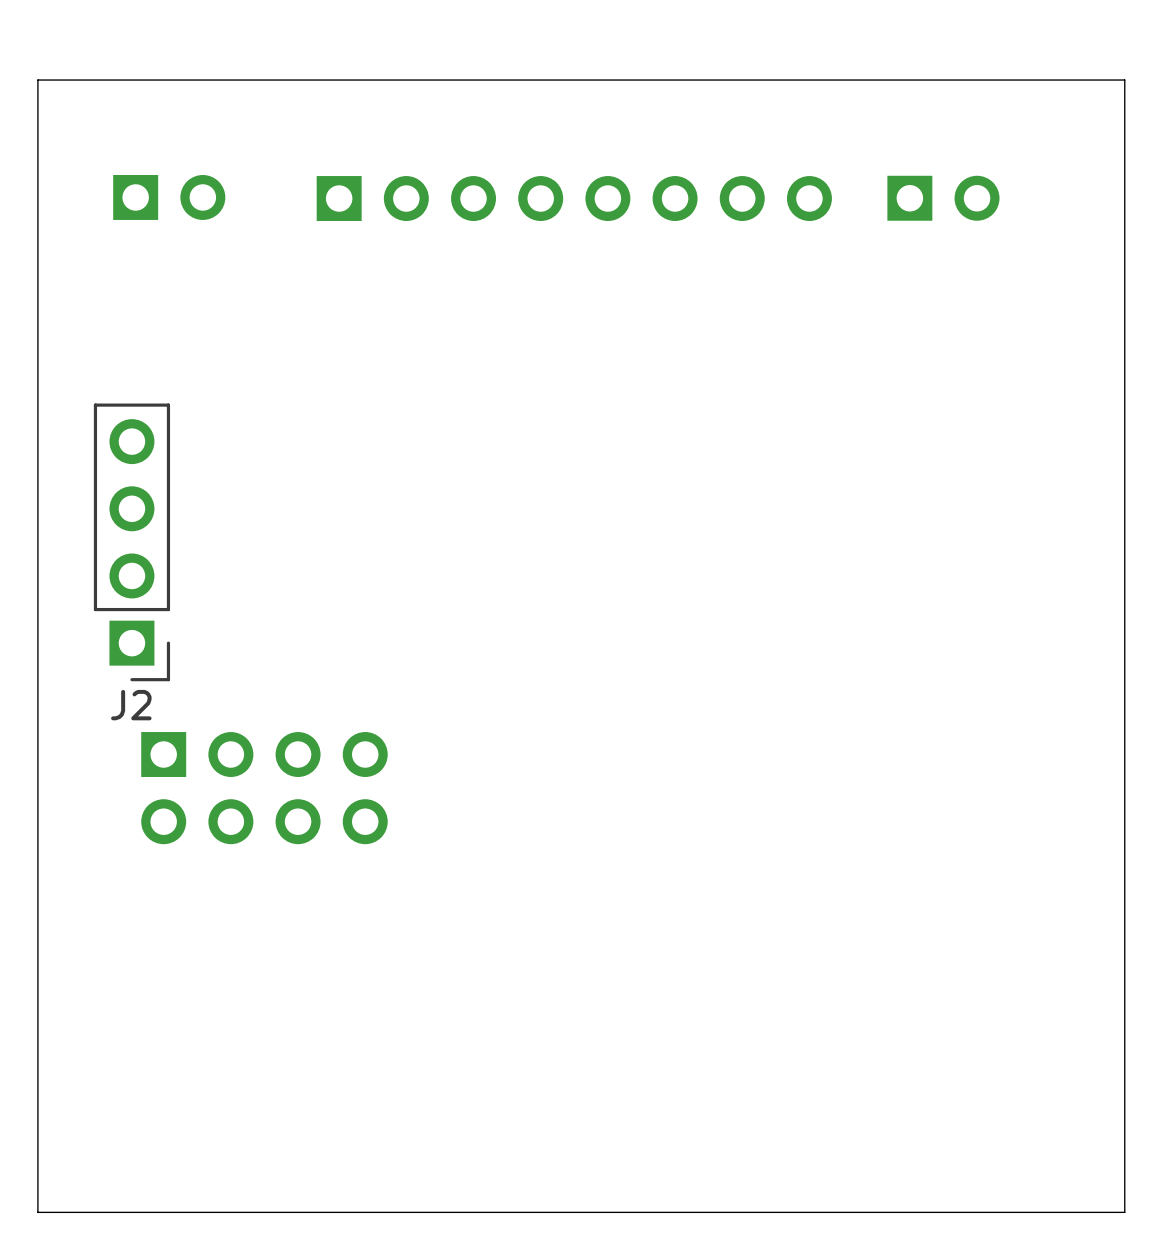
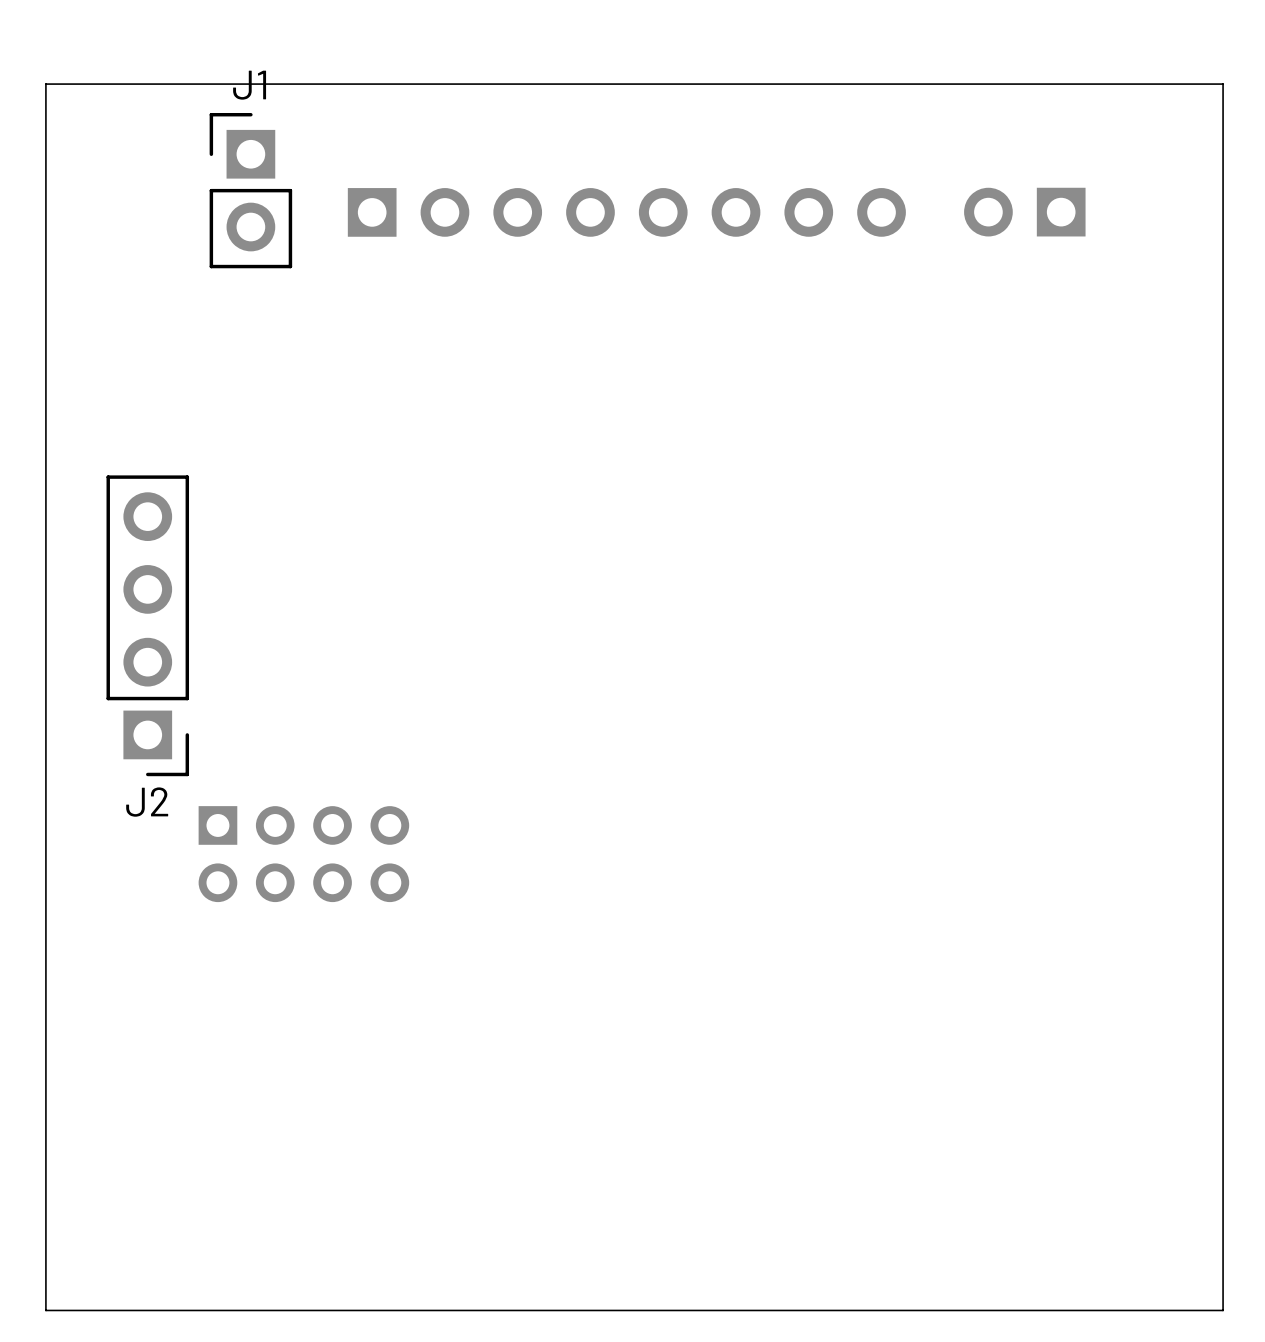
J1 side: top (169, 197) -> bottom (250, 190)
part rotation: 0° (943, 198) -> 180° (1024, 212)
J2 position: (131, 542) -> (147, 625)
part footprint: [141, 732, 388, 845] -> [198, 806, 410, 903]

